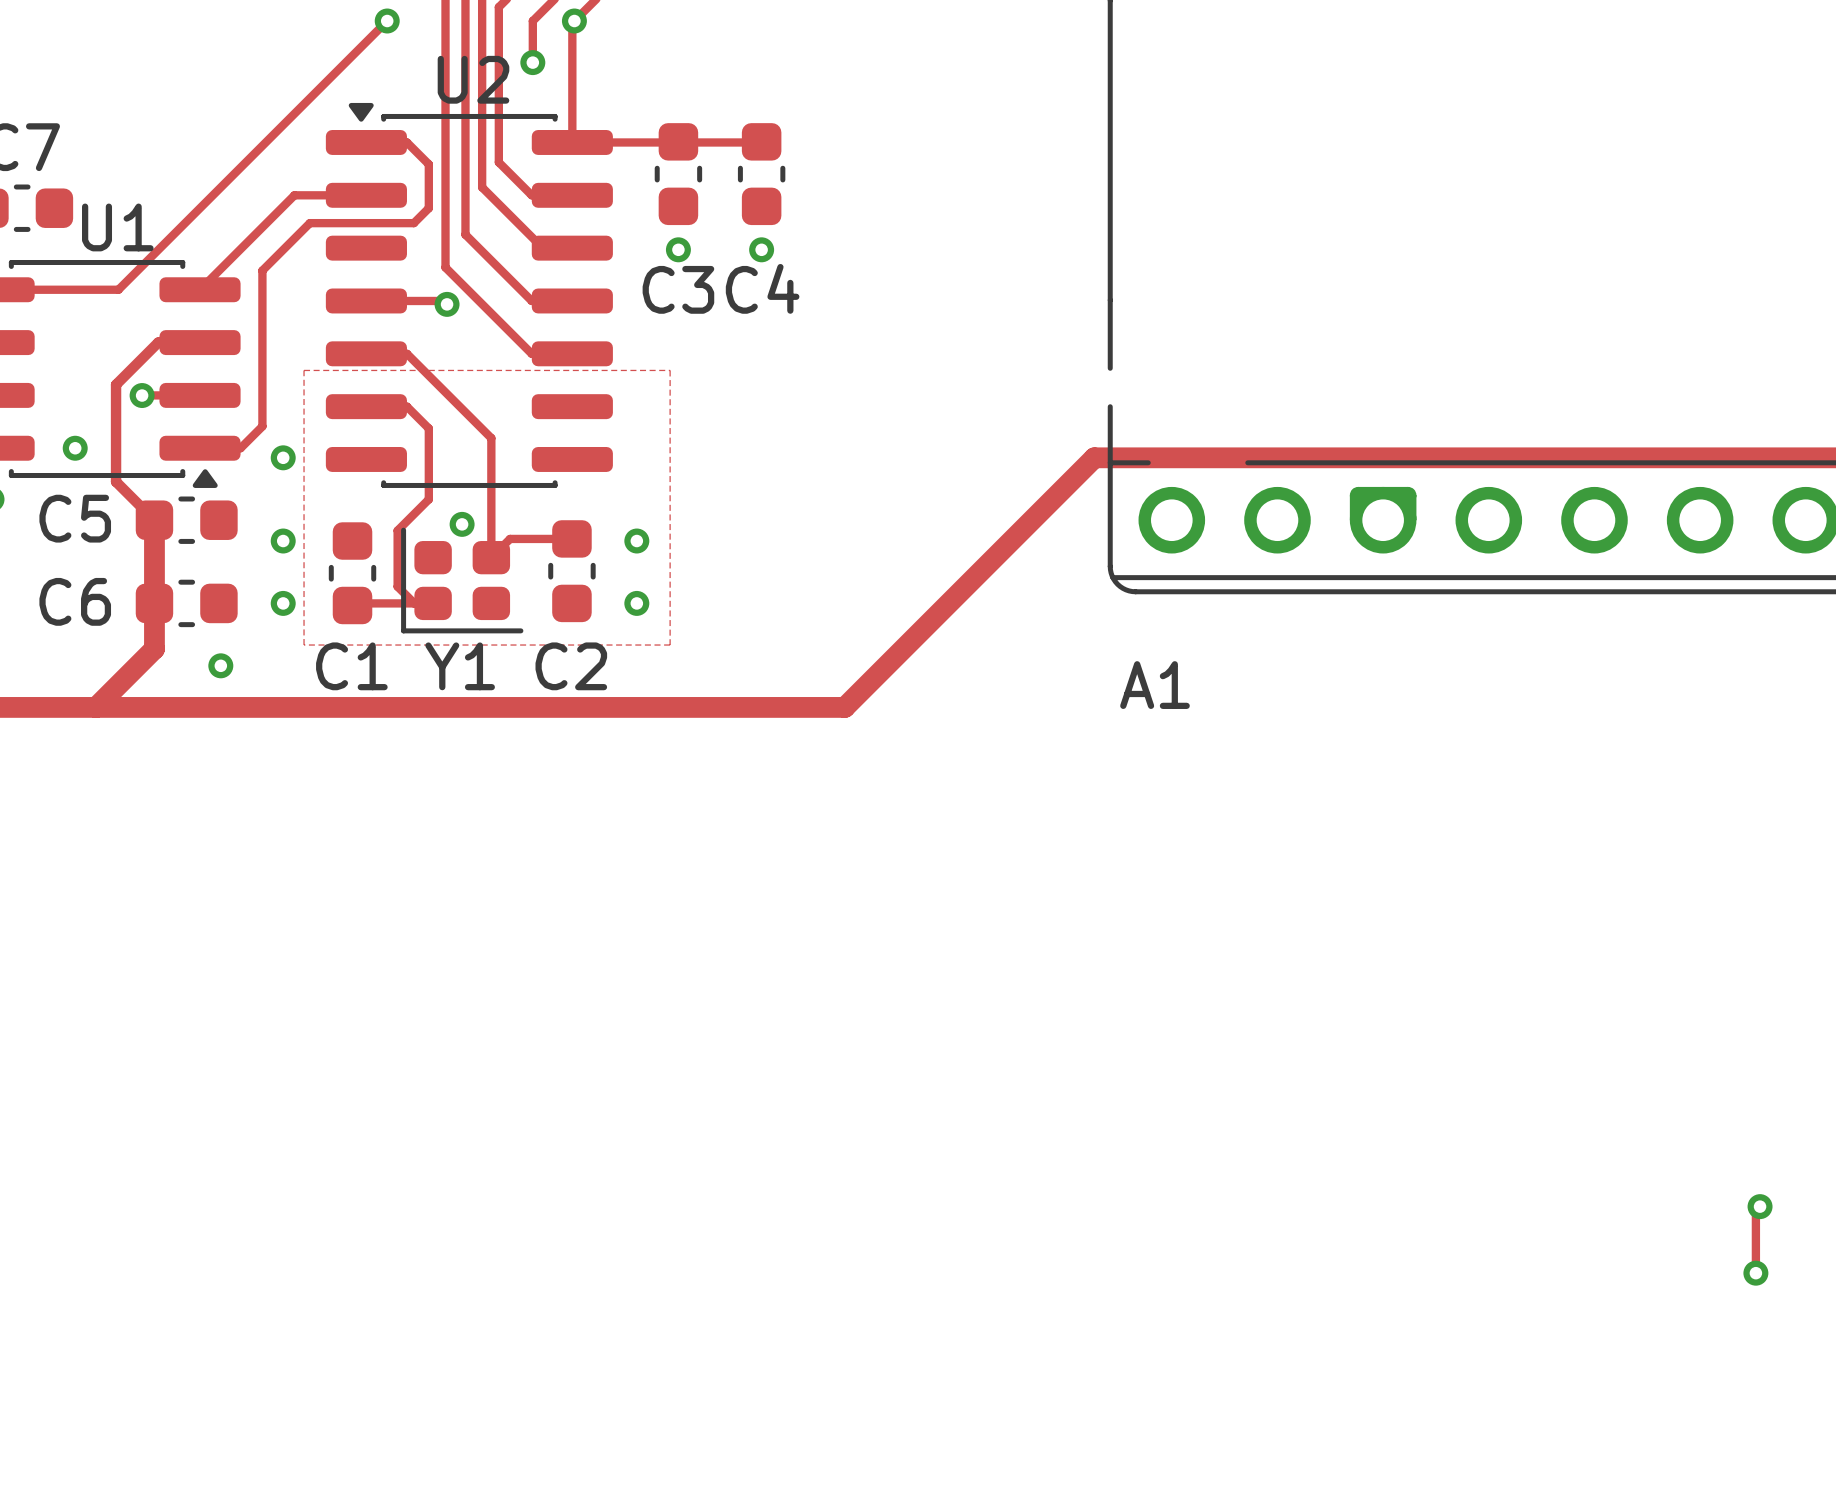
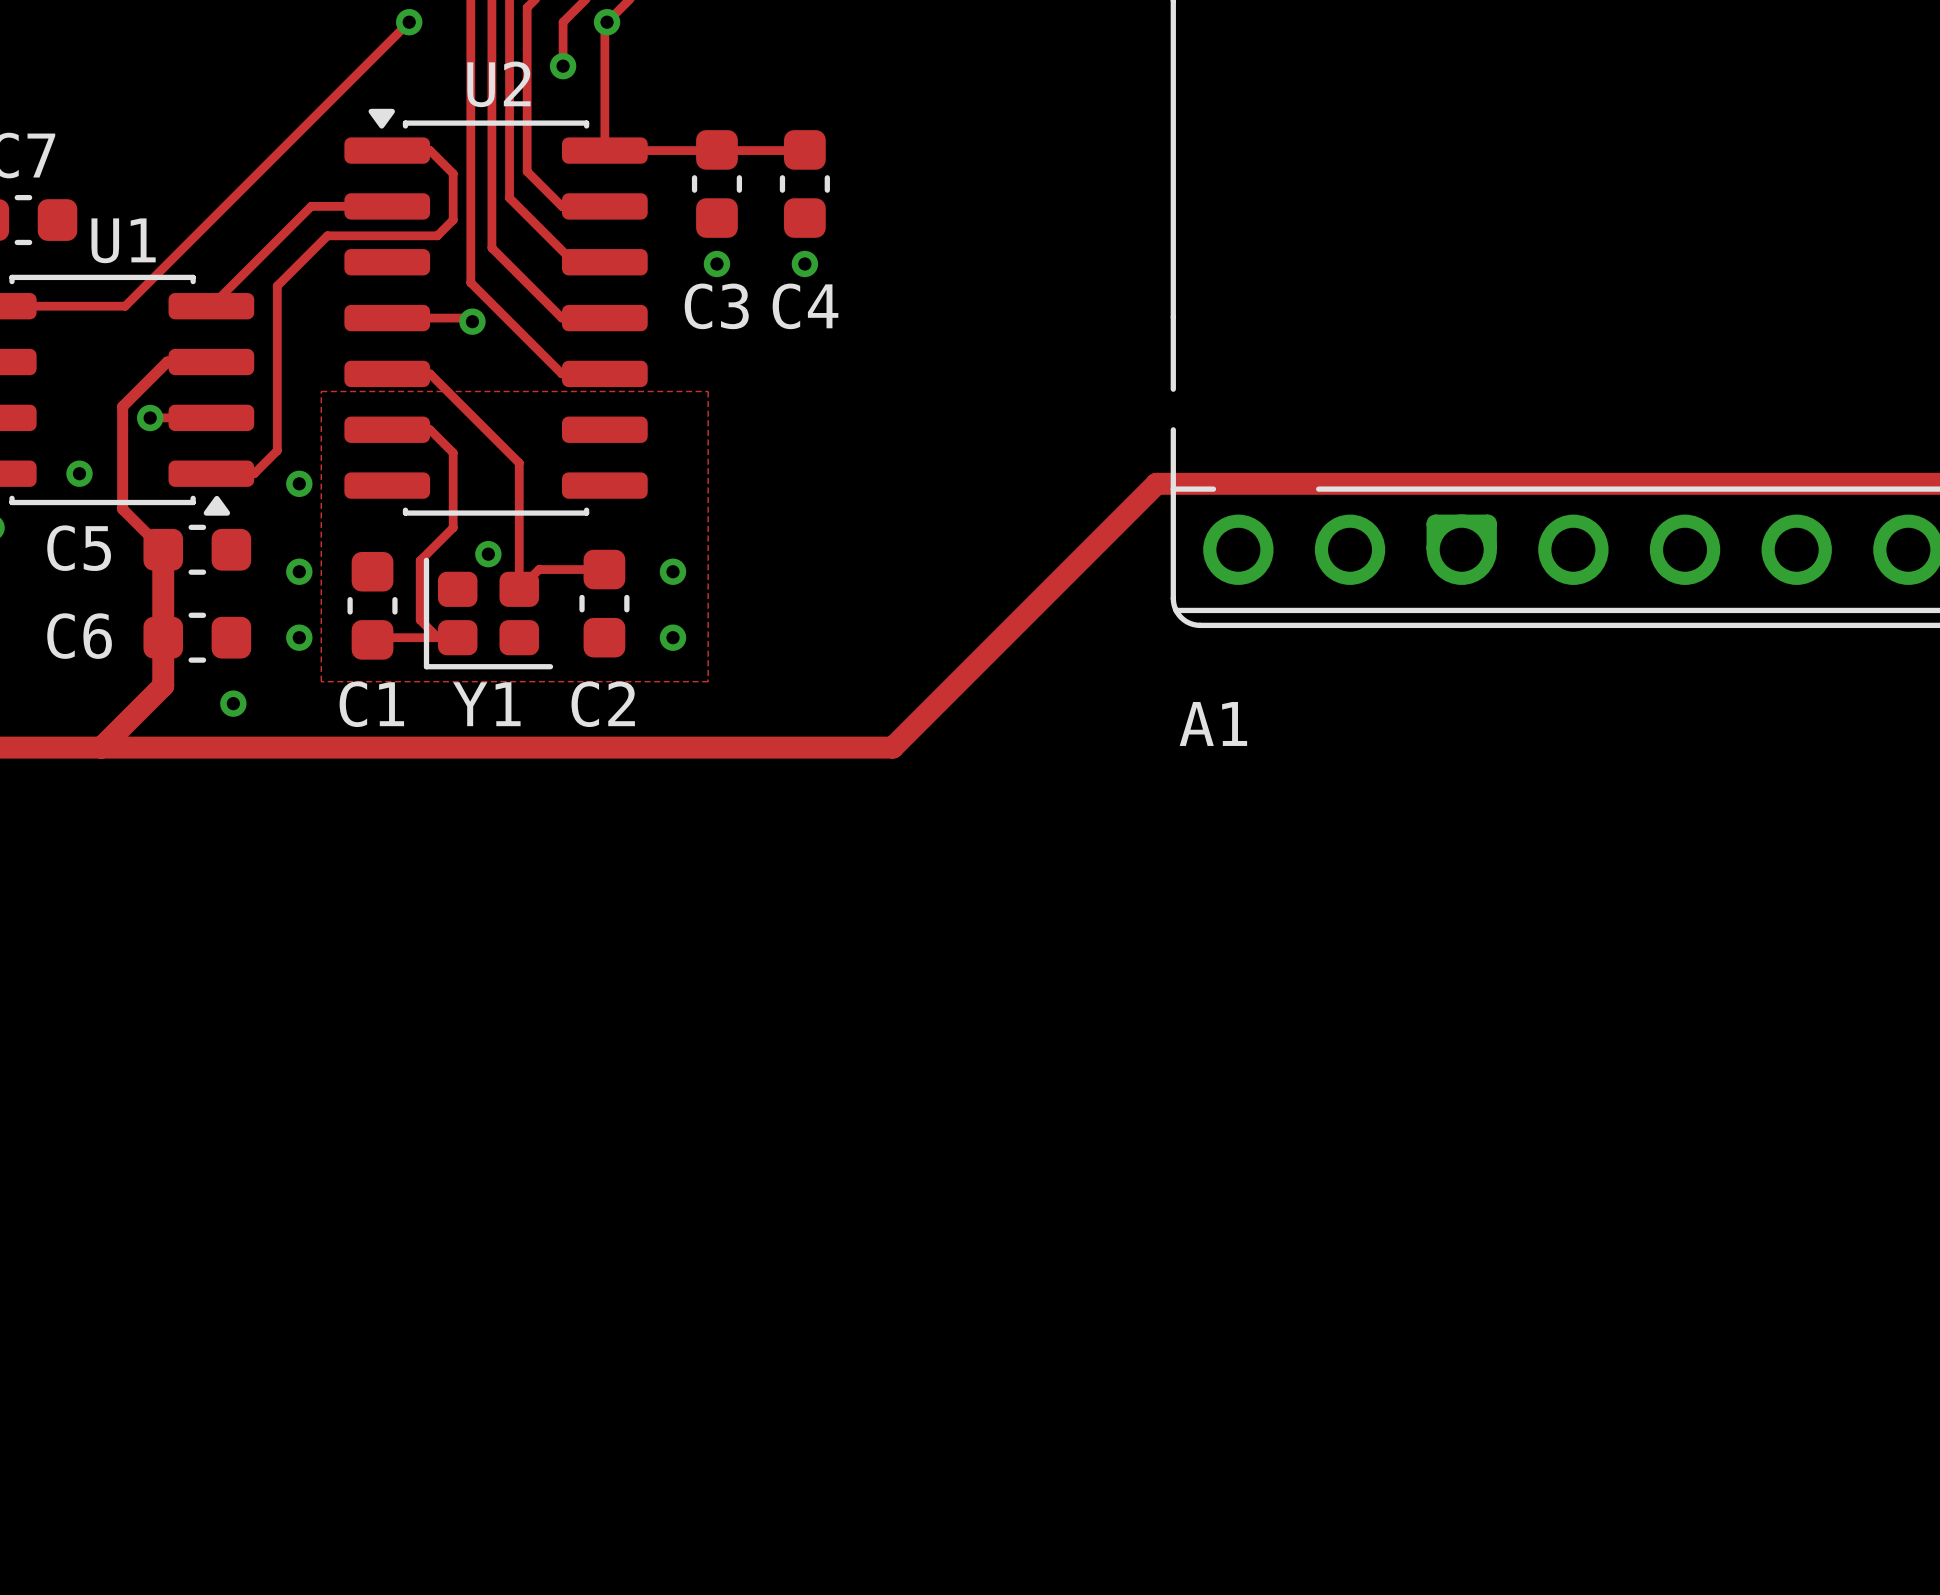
track: (1760, 1206) (1755, 1210) (1755, 1273) -> none
via: (1760, 1206) -> none
via: (1755, 1273) -> none

